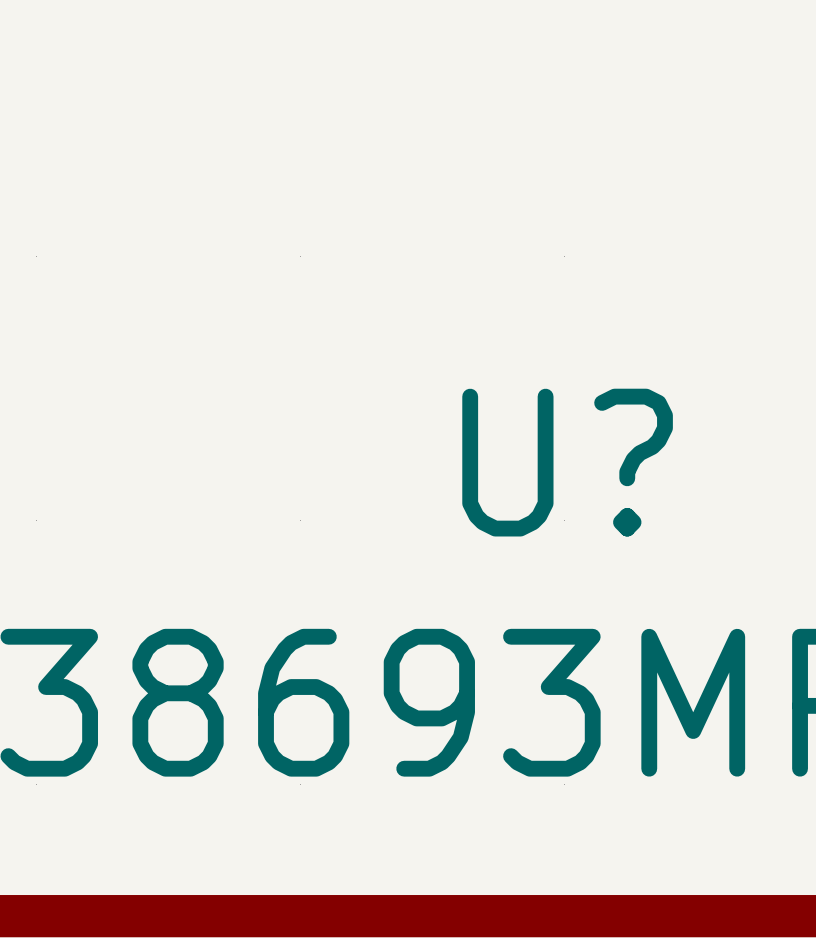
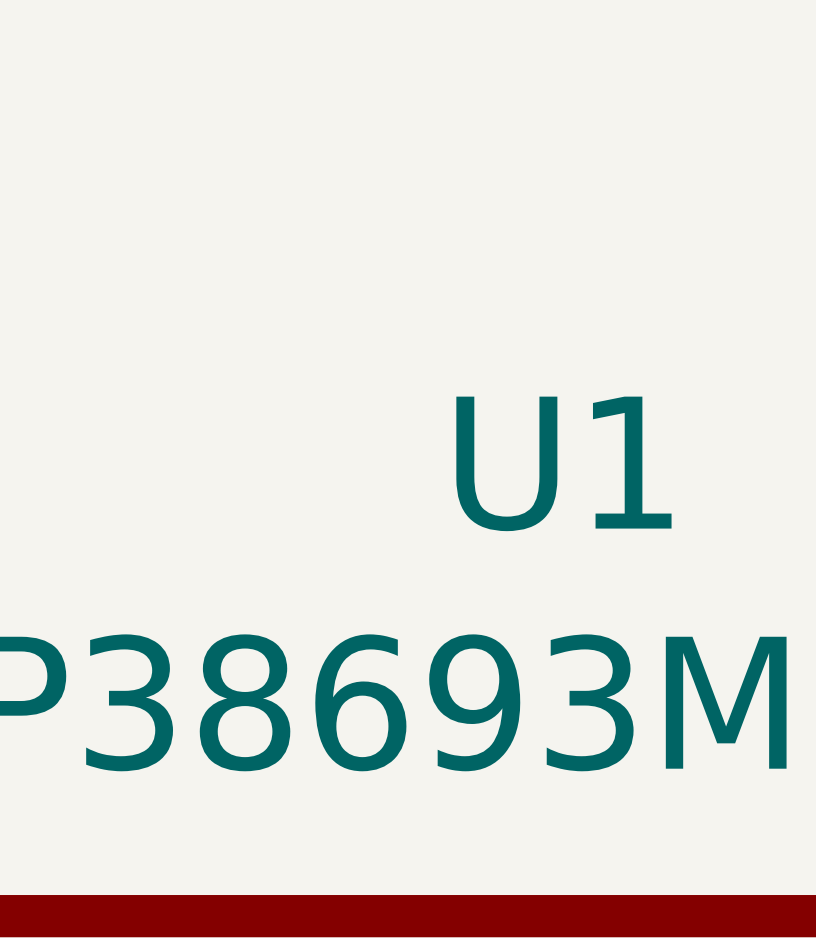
U? name: U? (567, 462) -> U1 (563, 463)

